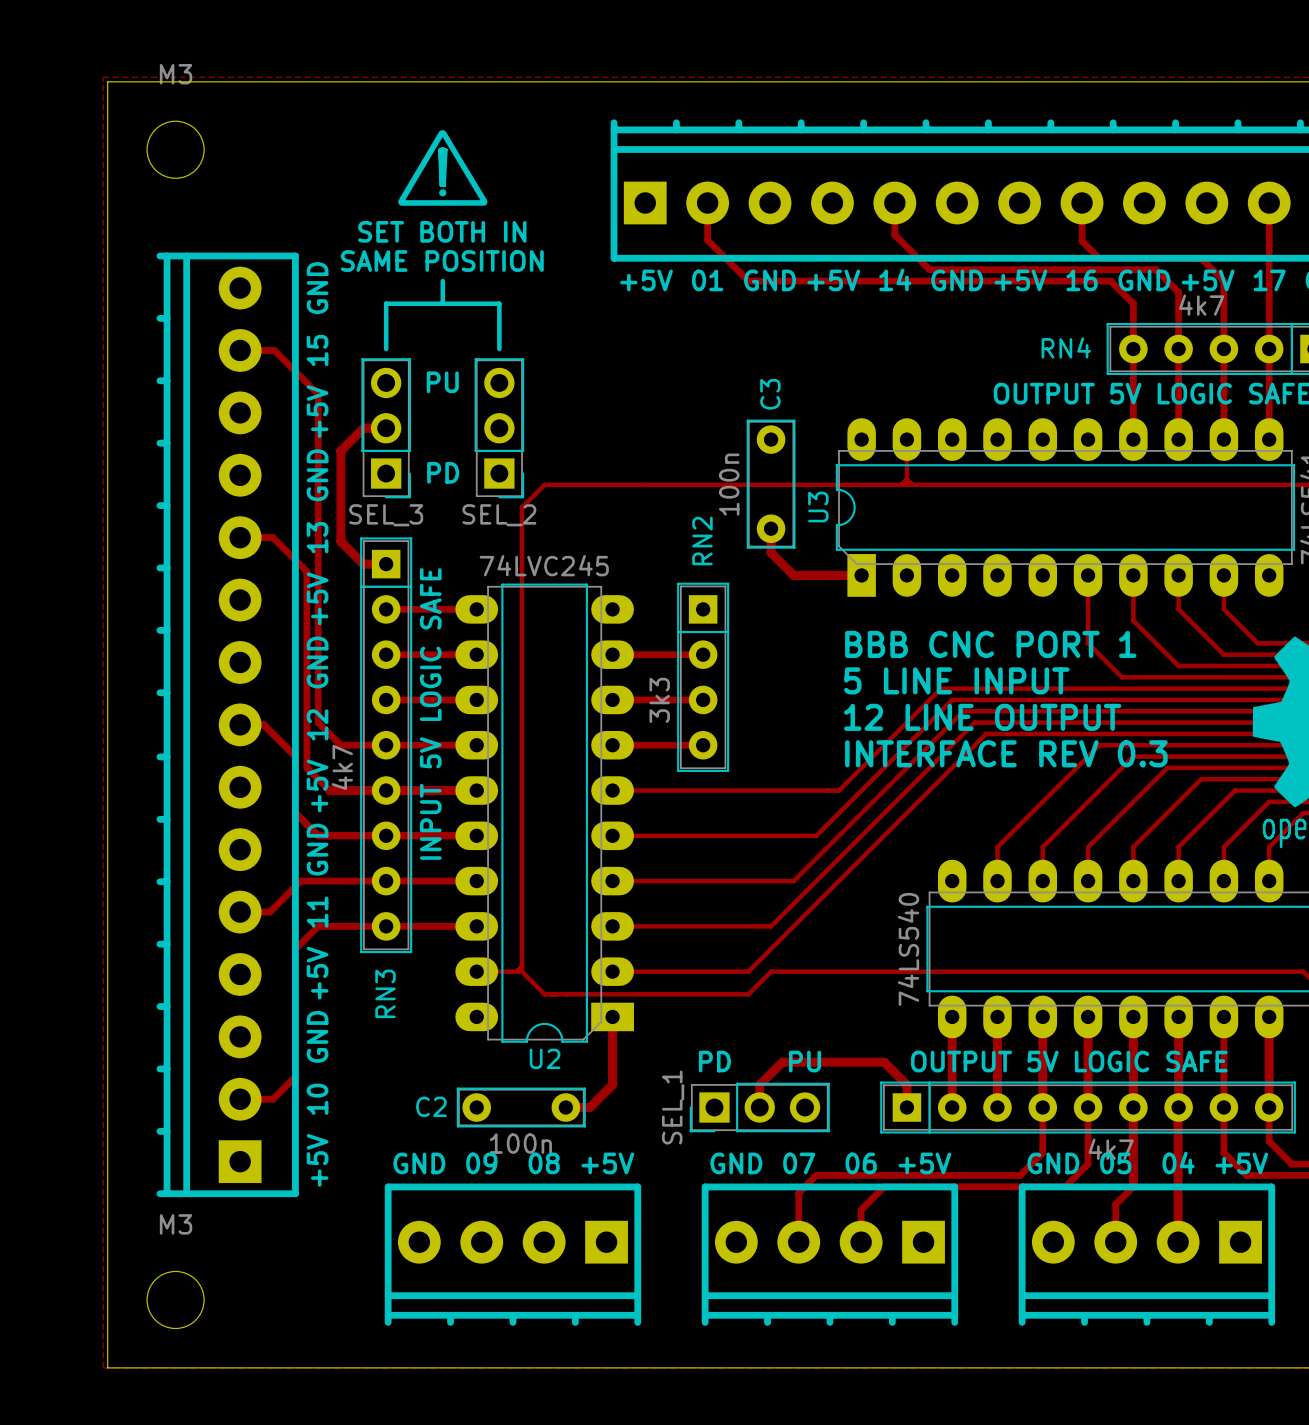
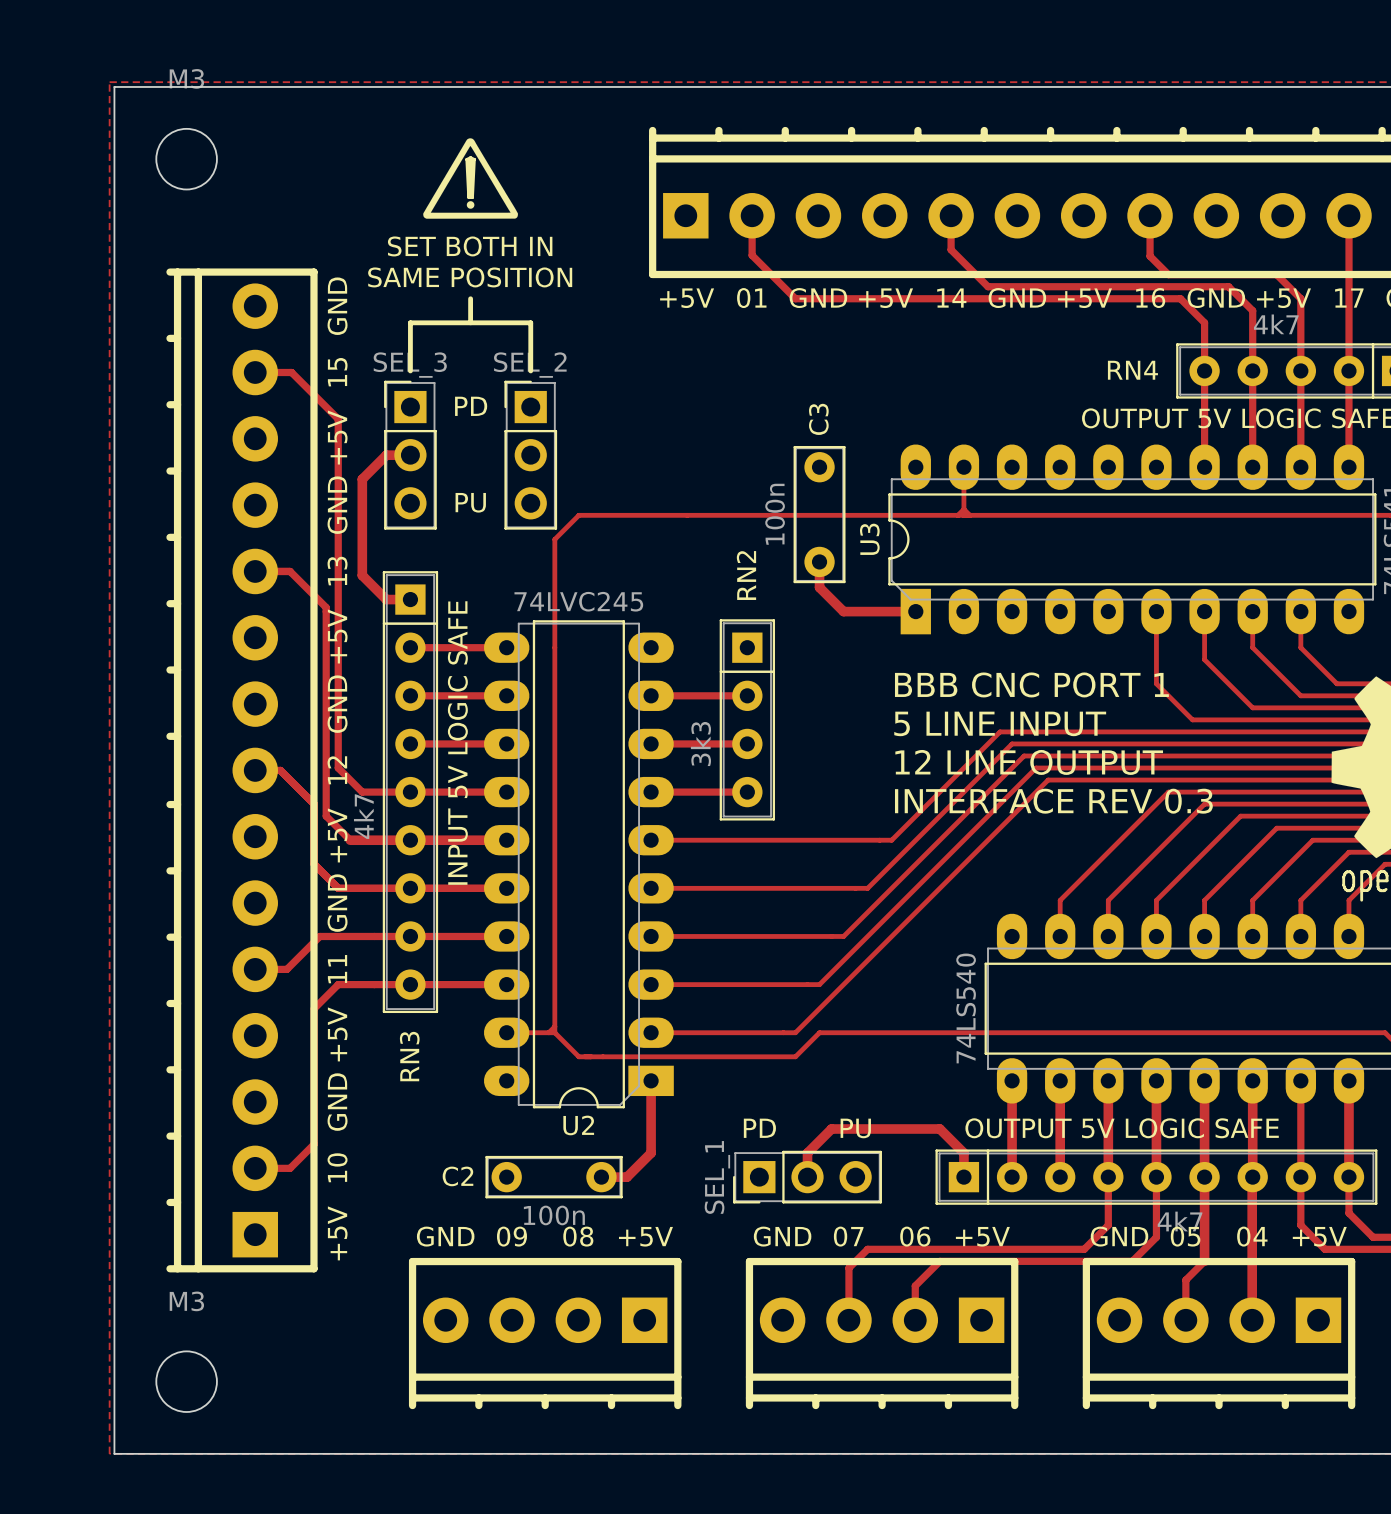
text: PU (442, 382) -> PD (471, 406)
SEL_3 rotation: 0° (386, 428) -> 180° (410, 455)
SEL_2 rotation: 0° (499, 428) -> 180° (530, 455)
text: PD (443, 472) -> PU (470, 502)

